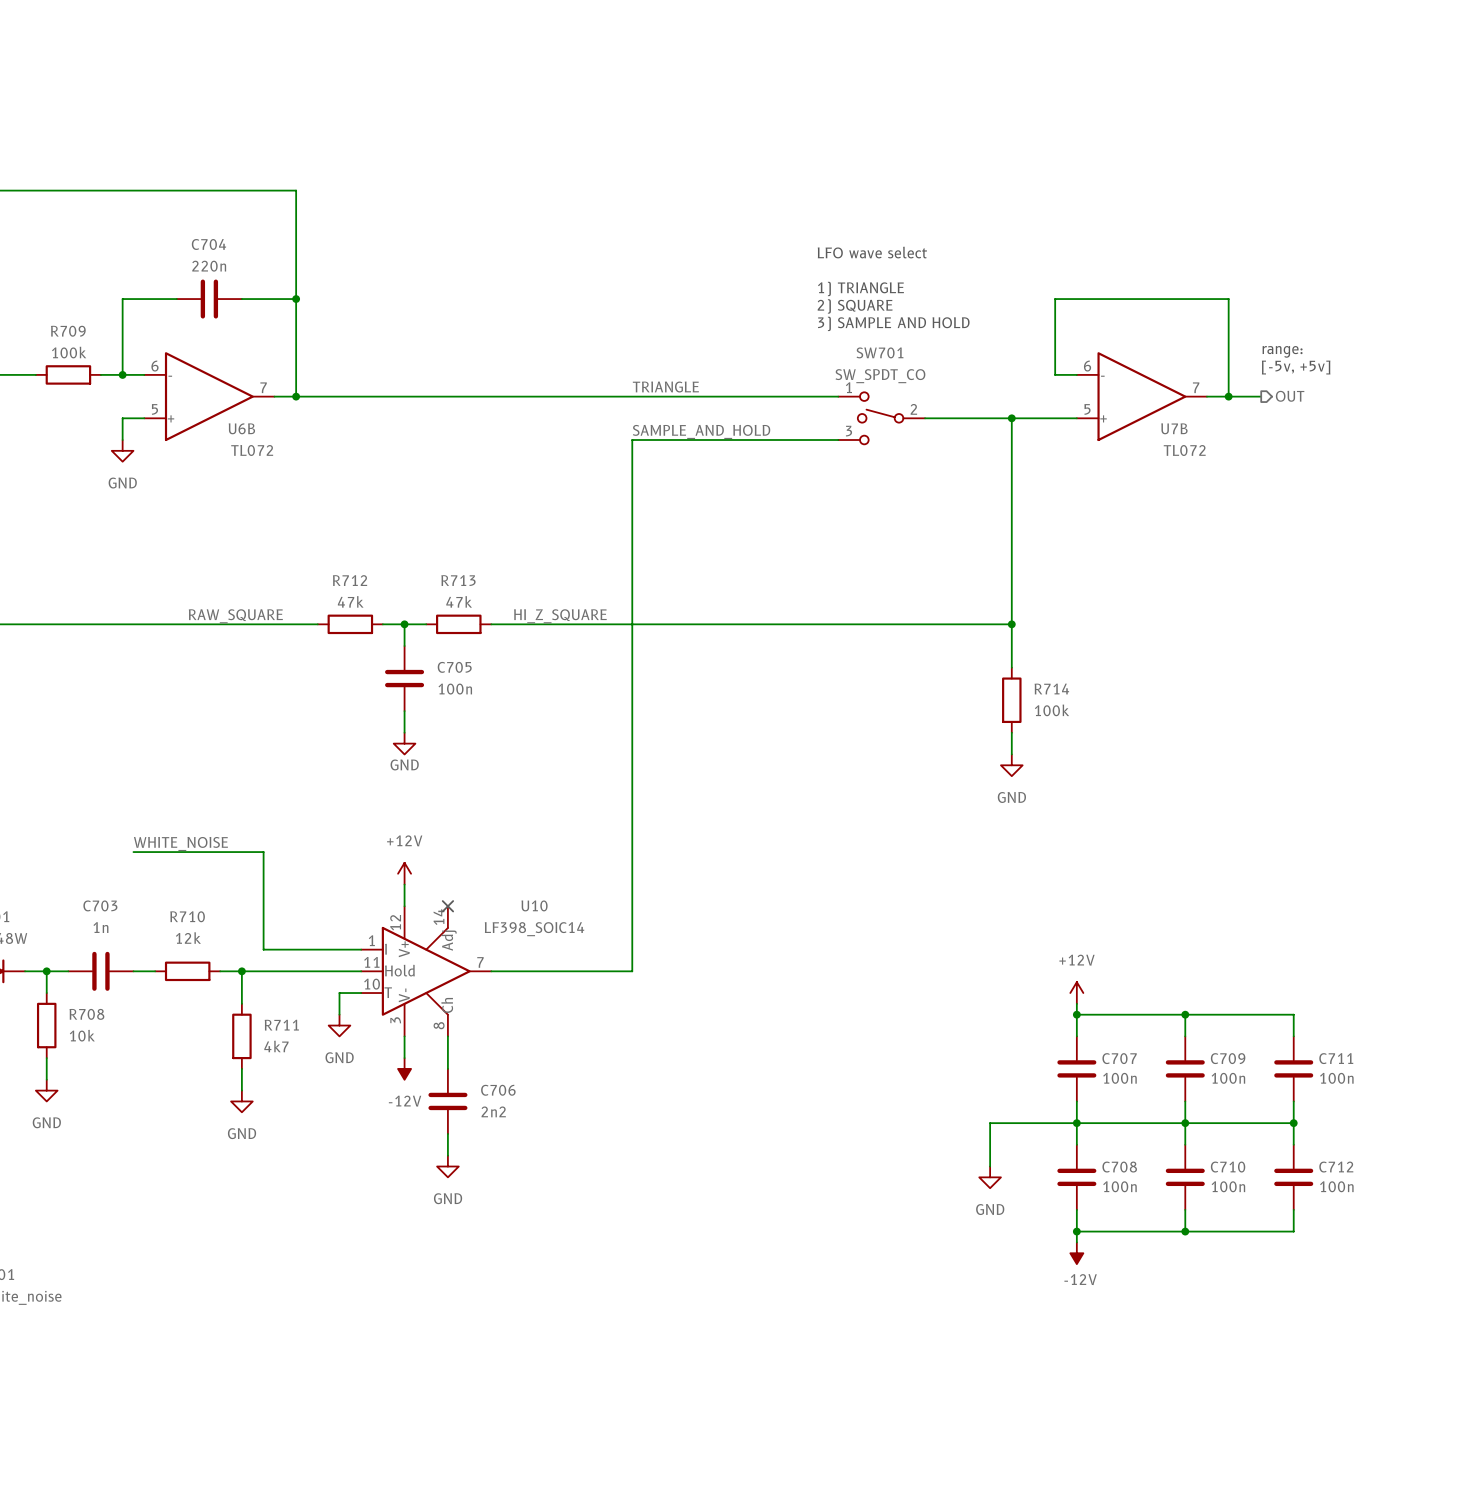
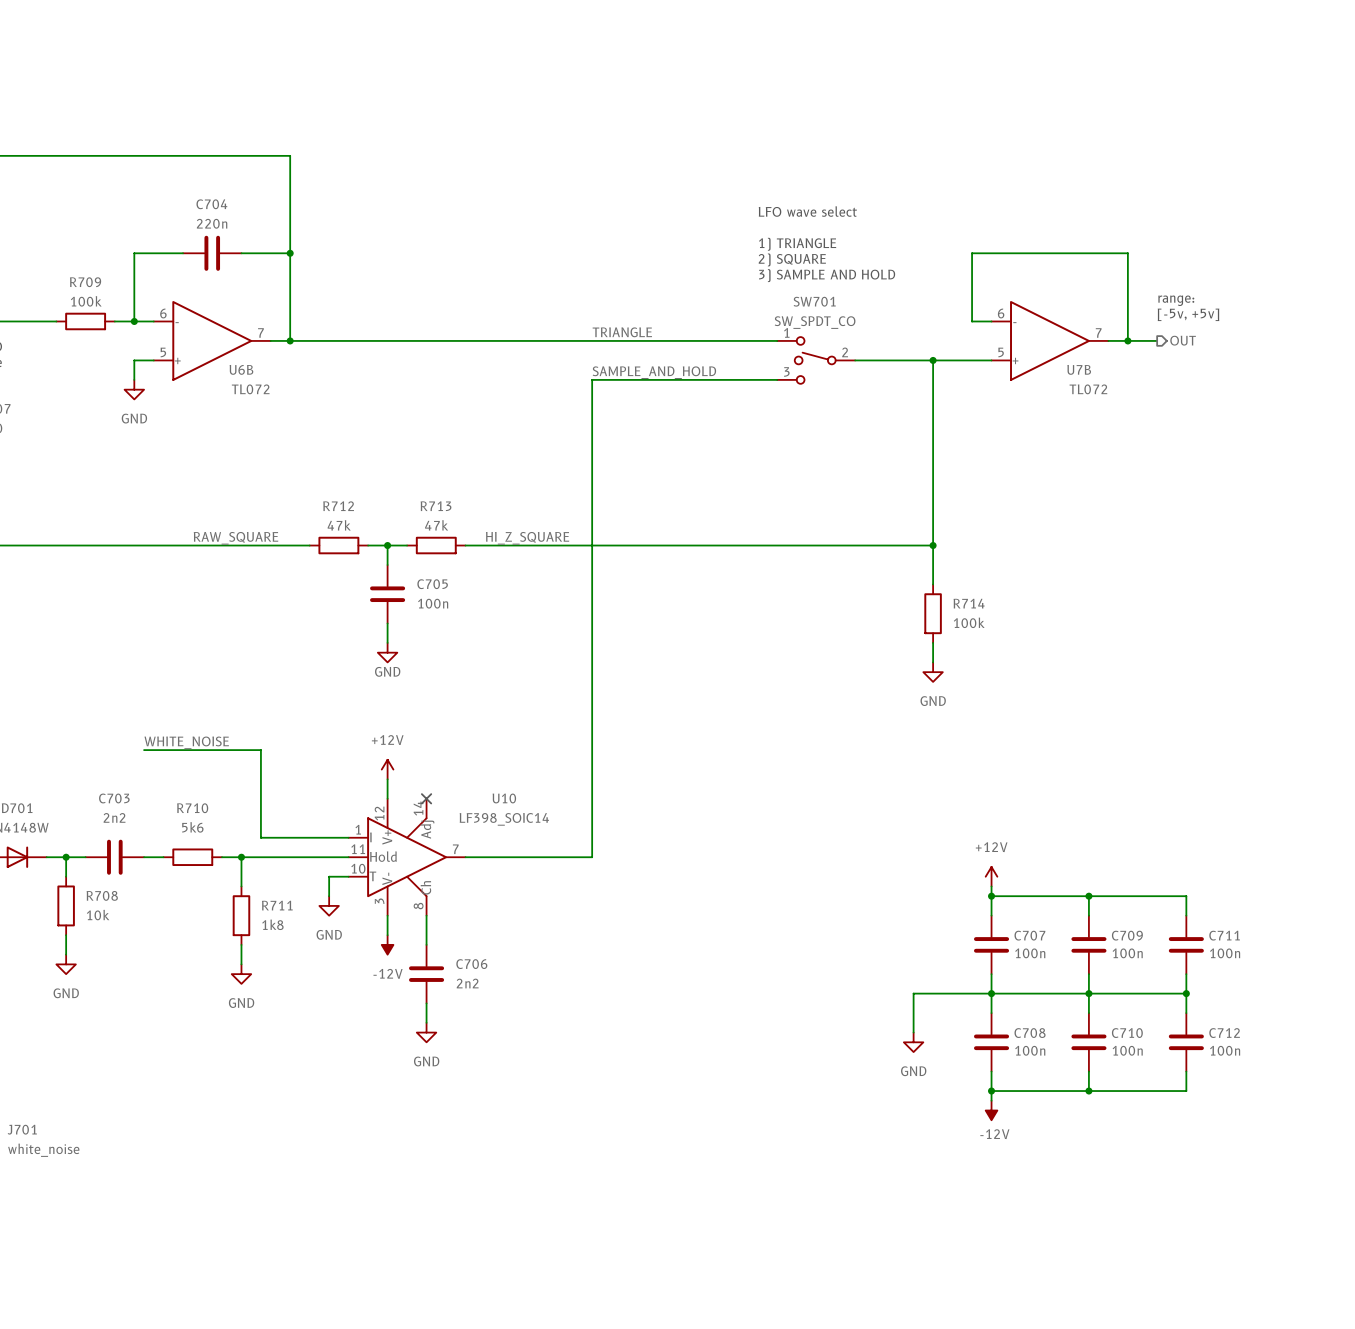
C703 value: 1n (100, 927) -> 2n2 (114, 817)
R710 value: 12k (188, 938) -> 5k6 (192, 827)
R711 value: 4k7 (276, 1046) -> 1k8 (272, 924)

